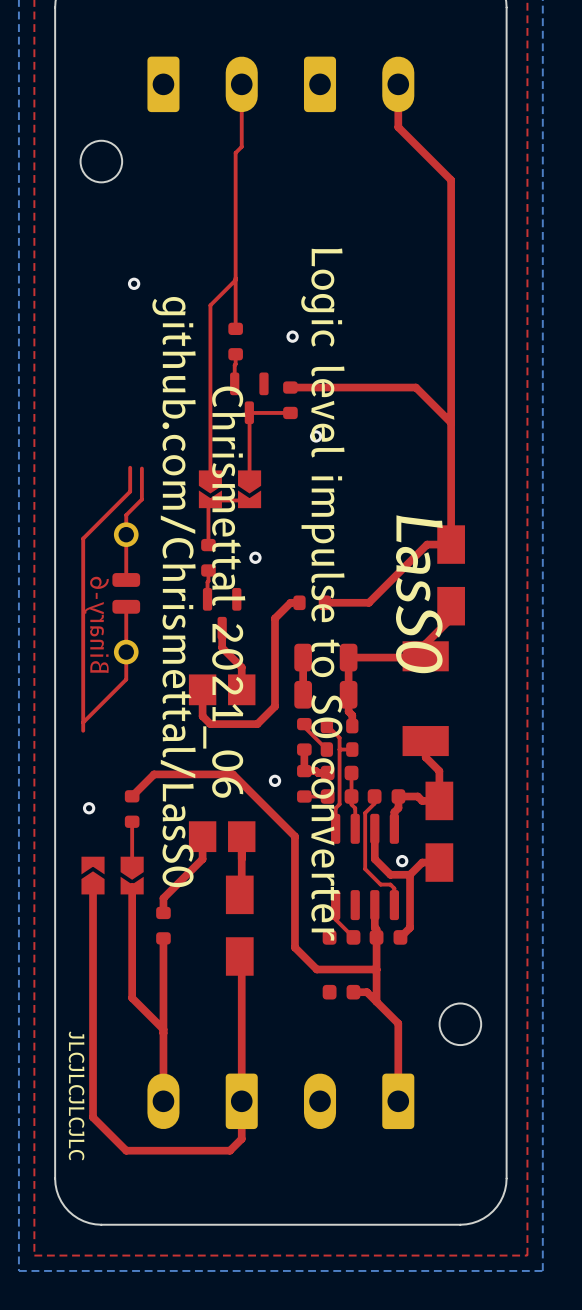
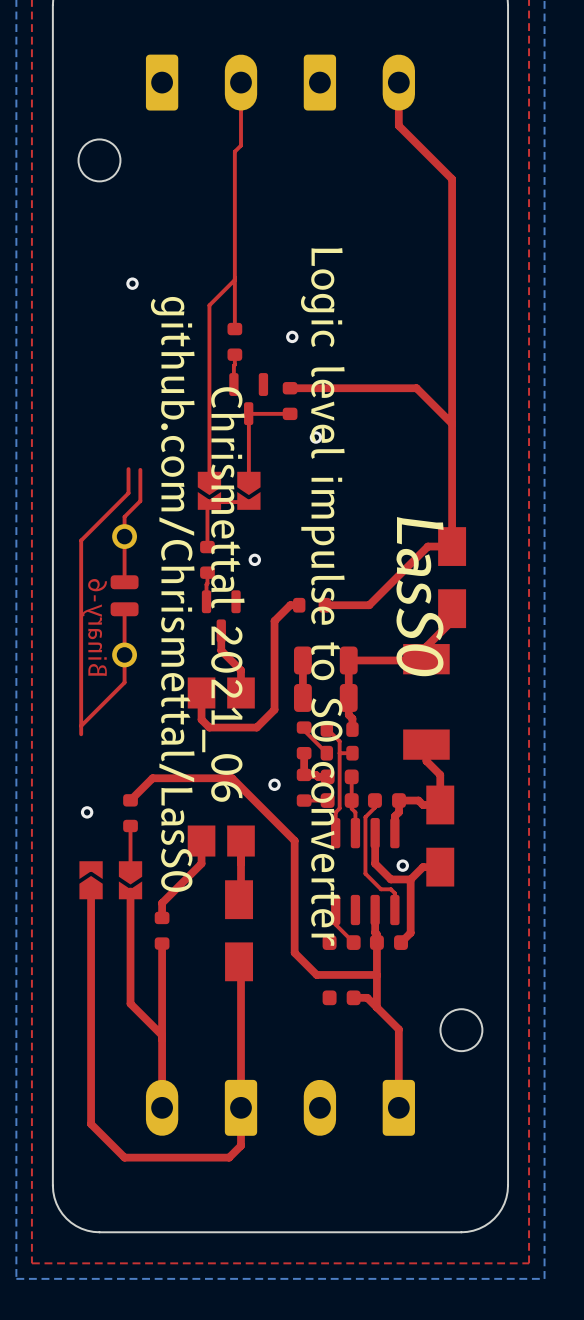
text: JLCJLCJLCJLC (76, 1095) -> none

